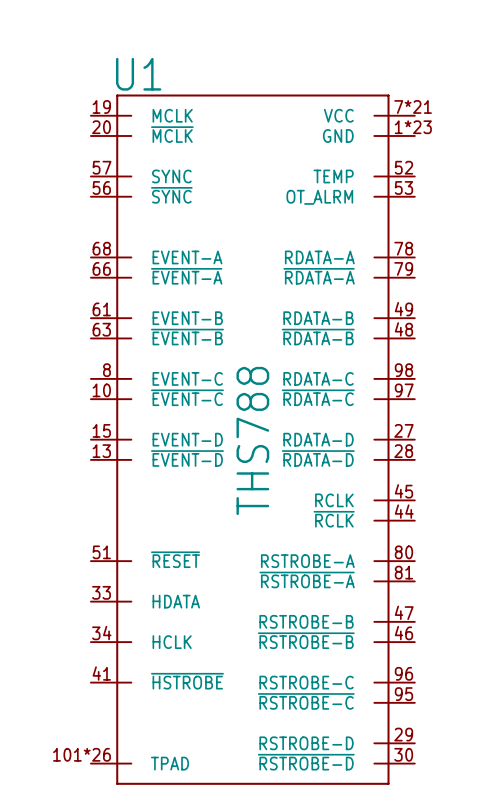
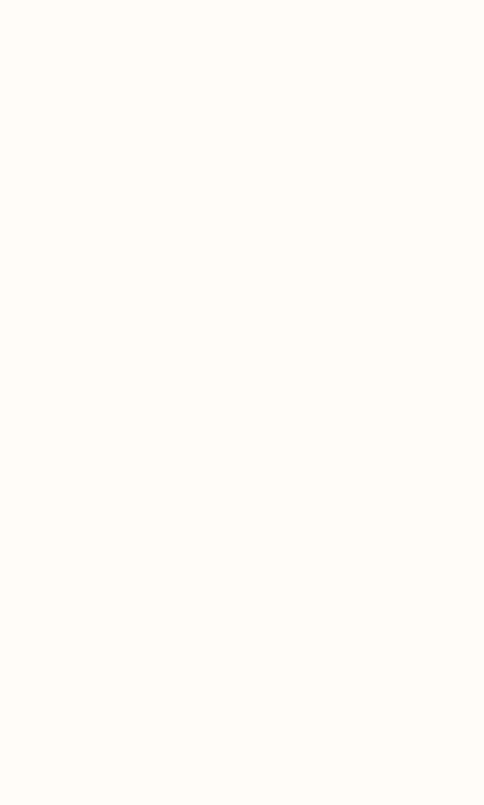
U1: (252, 439) -> none

